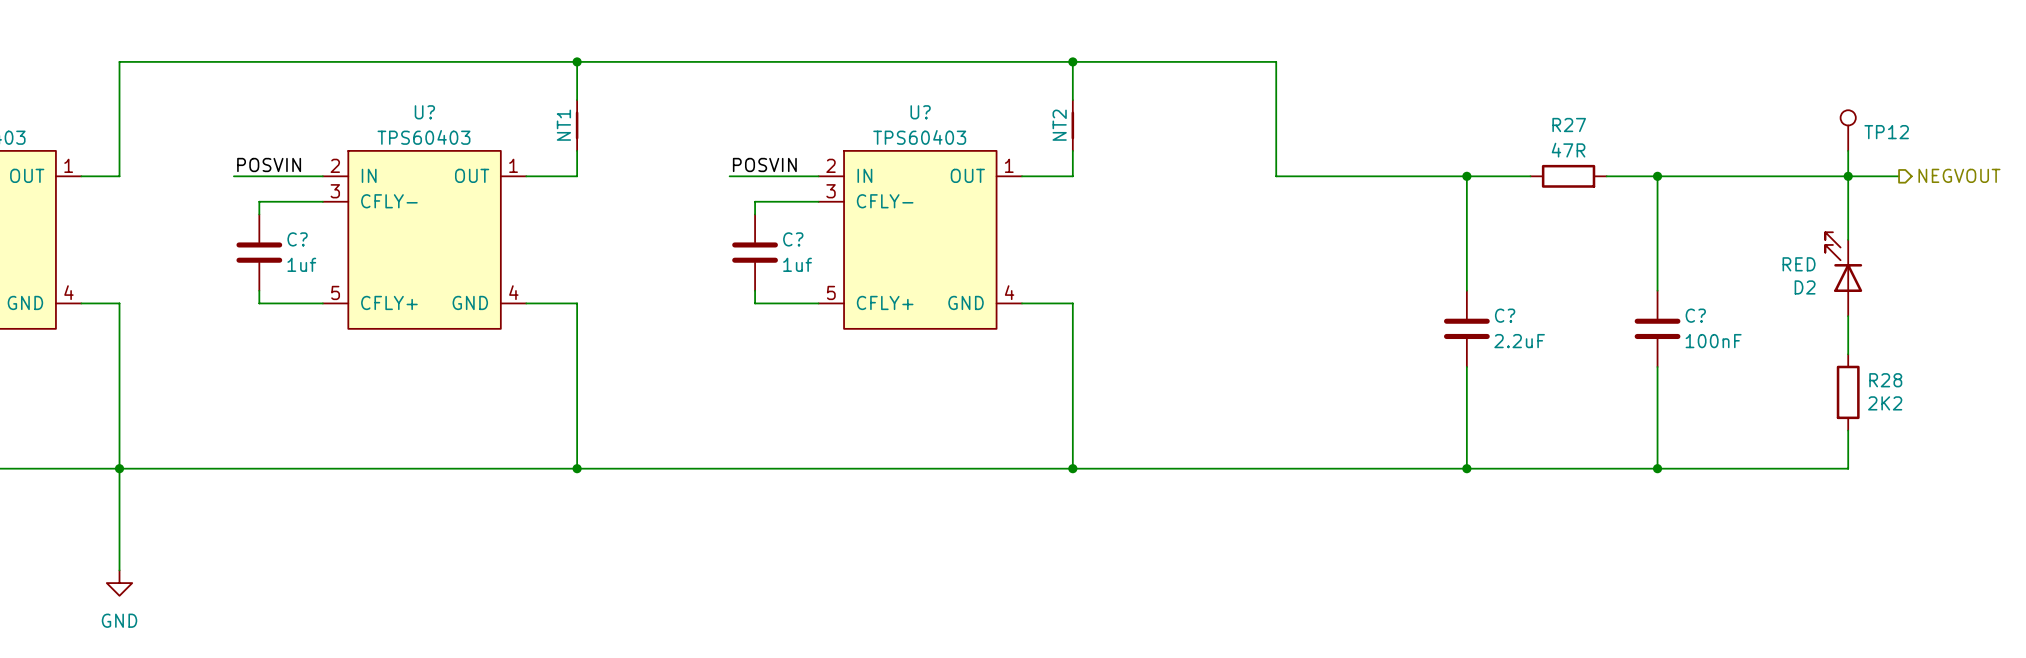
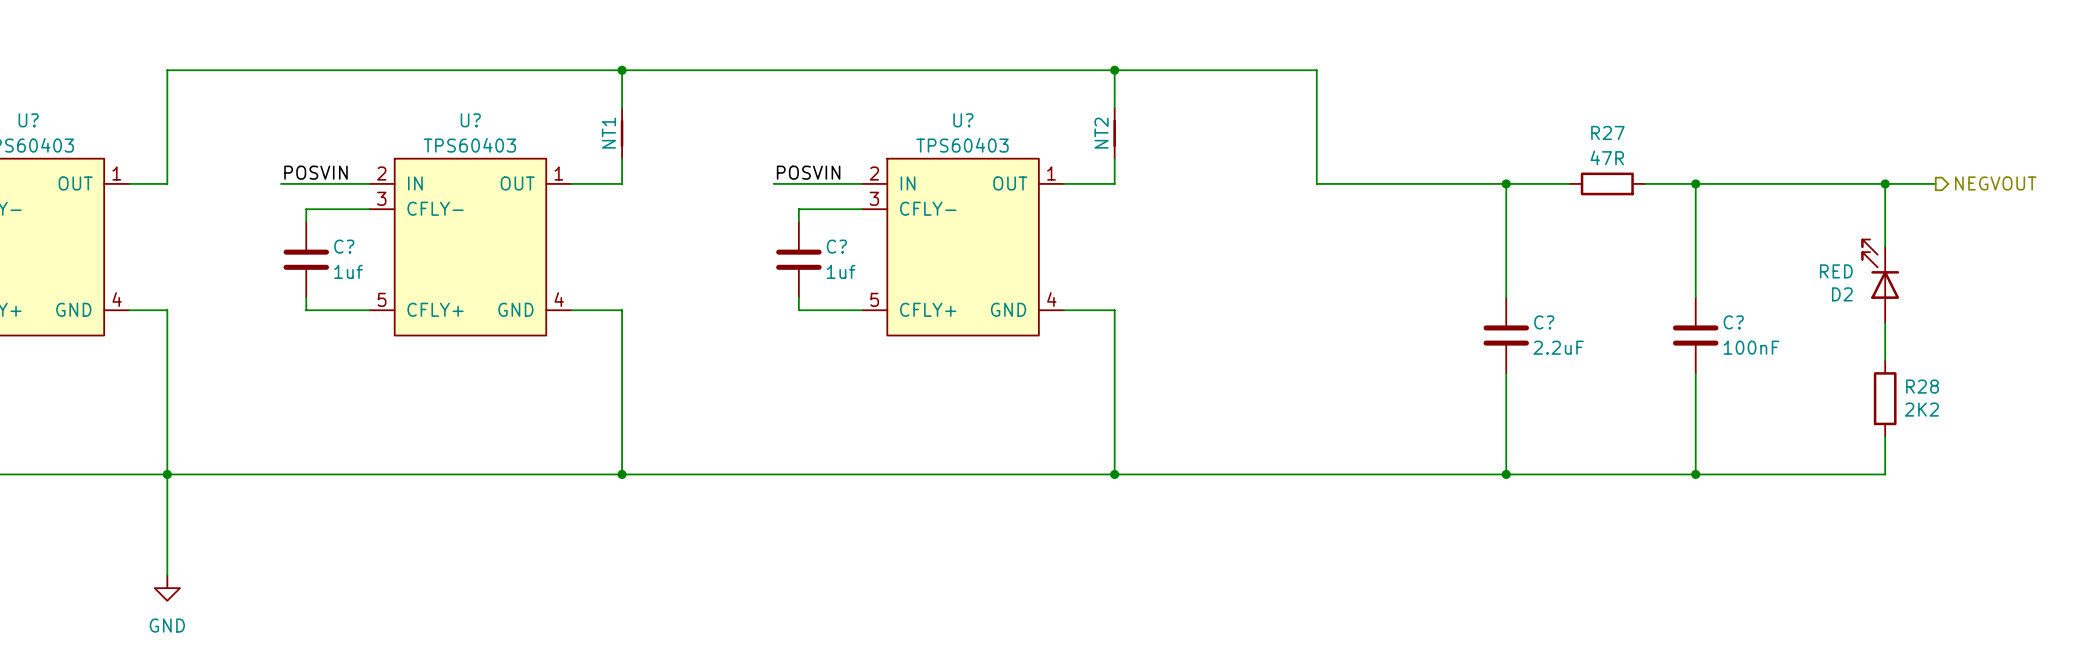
TP12: (1848, 130) -> none
wire: (1848, 150) (1848, 176) -> none

